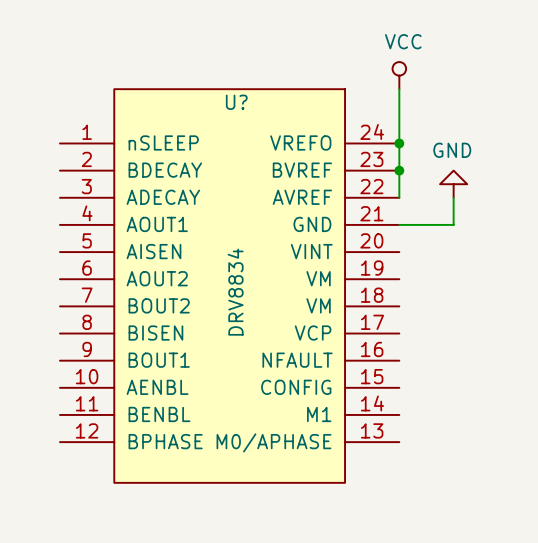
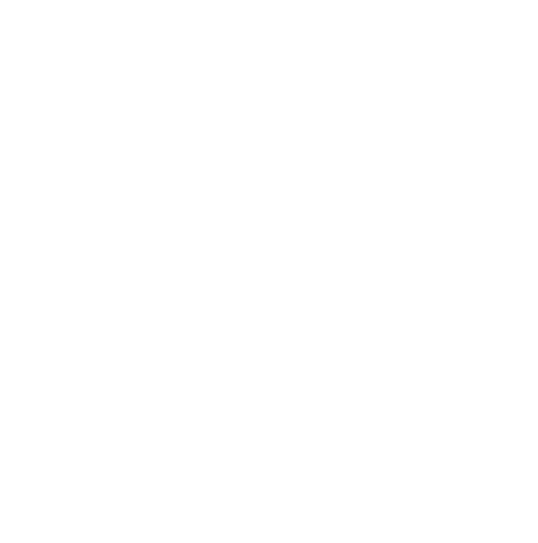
power symbol: VCC (399, 75) -> none
wire: (399, 89) (399, 197) -> none
junction: (399, 143) -> none
junction: (399, 170) -> none
power symbol: GND (453, 184) -> none
wire: (453, 197) (453, 224) (399, 224) -> none
U?: DRV8834 (229, 286) -> none

